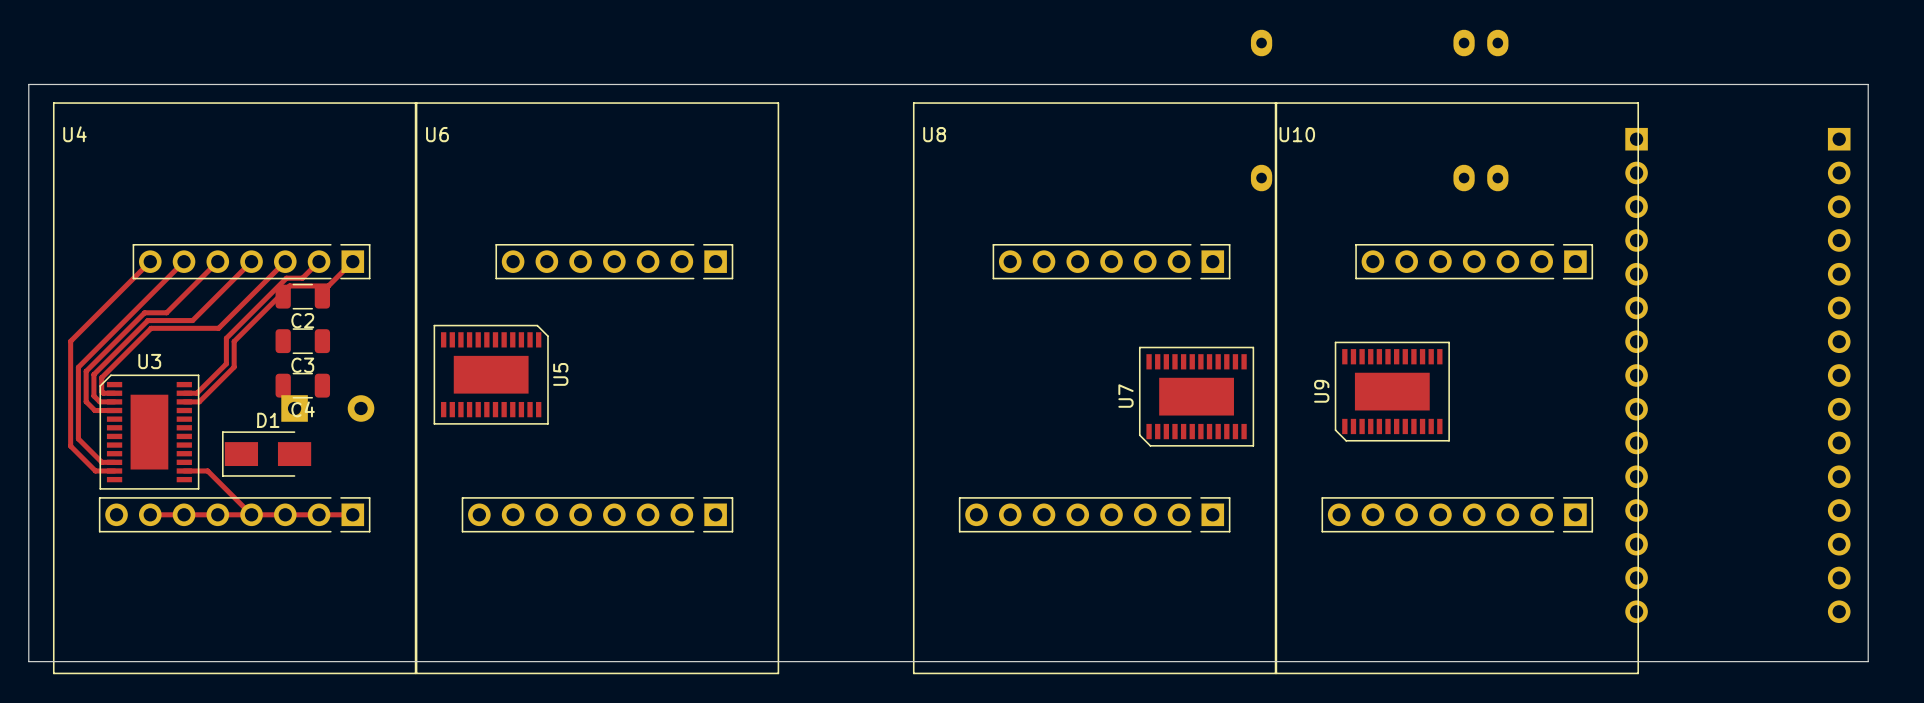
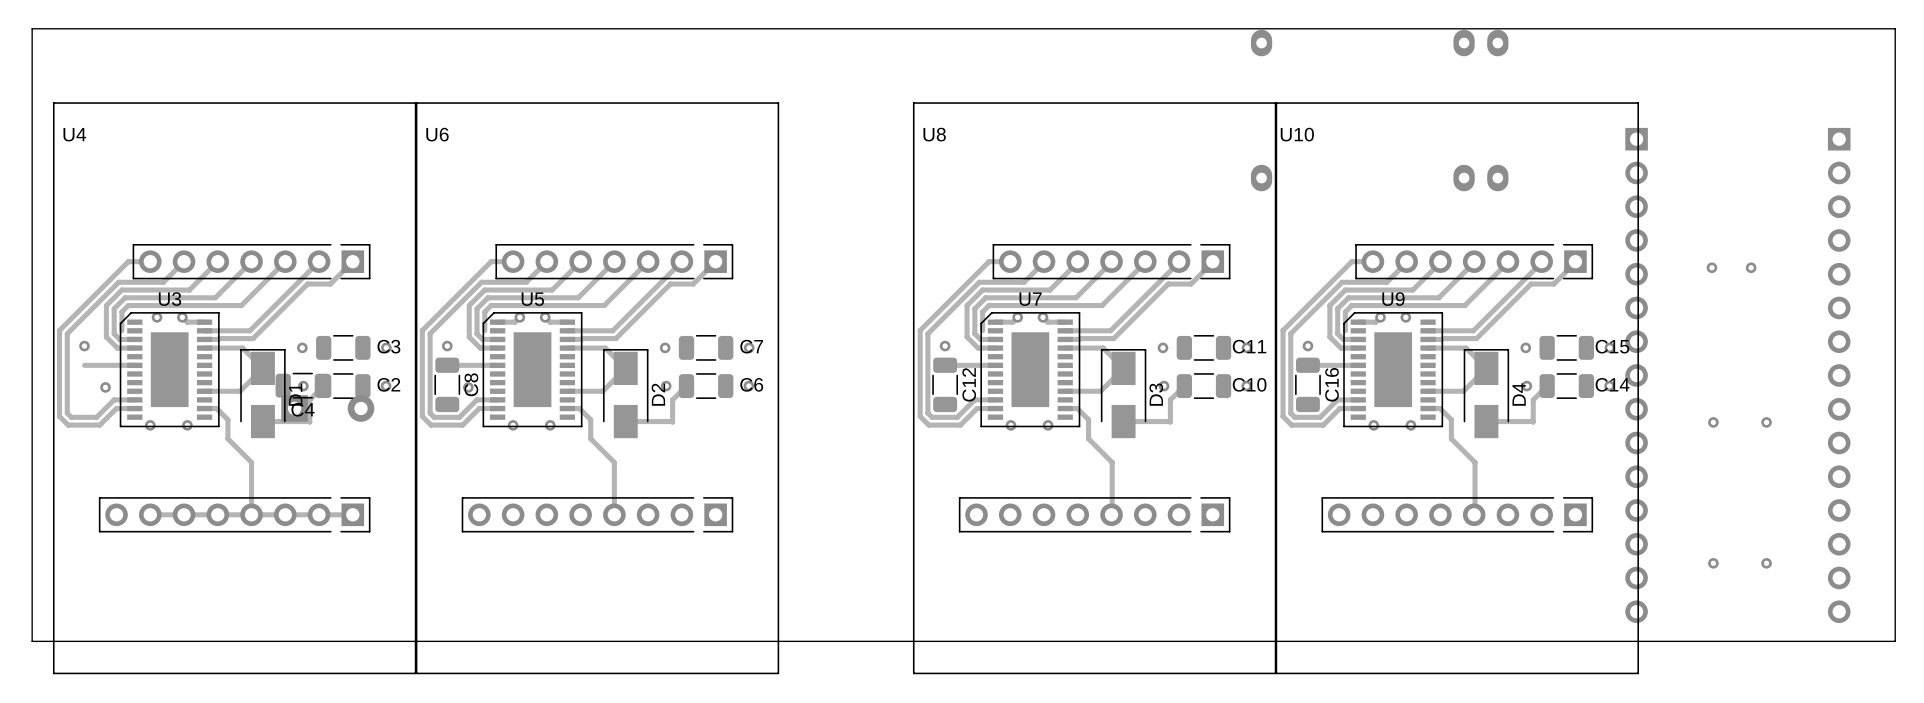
board edge: (28, 84) (28, 661) (1868, 661) (1868, 84) (28, 84) -> (32, 28) (32, 641) (1895, 641) (1895, 28) (32, 28)
track: (150, 261) (121, 290) -> (189, 290) (121, 290)
track: none -> (150, 261) (128, 261) (59, 330) (59, 416) (68, 425) (99, 425) (116, 408) (134, 408)
track: none -> (513, 261) (491, 261) (422, 330) (422, 416) (430, 425) (462, 425) (479, 408) (497, 408)
track: none -> (546, 261) (526, 282) (481, 282) (430, 333) (430, 413) (434, 417) (459, 417) (476, 399) (497, 399)
track: none -> (580, 261) (552, 290) (484, 290) (469, 305) (469, 337) (480, 348) (497, 348)
track: none -> (614, 261) (578, 297) (487, 297) (477, 308) (477, 333) (482, 339) (497, 339)
track: none -> (648, 261) (604, 305) (491, 305) (484, 311) (484, 330)
track: none -> (681, 261) (612, 330) (567, 330)
track: none -> (715, 261) (693, 284) (670, 284) (615, 338) (567, 339)
track: none -> (1010, 261) (989, 261) (920, 330) (920, 416) (928, 425) (960, 425) (977, 408) (995, 408)
track: none -> (1044, 261) (1024, 282) (979, 282) (927, 333) (927, 413) (932, 417) (957, 417) (974, 399) (995, 399)
track: none -> (1078, 261) (1050, 290) (982, 290) (967, 305) (967, 337) (978, 348) (995, 348)
track: none -> (1112, 261) (1076, 297) (985, 297) (974, 308) (974, 333) (980, 339) (995, 339)
track: none -> (1145, 261) (1102, 305) (989, 305) (982, 311) (982, 330)
track: none -> (1179, 261) (1110, 330) (1065, 330)
track: none -> (1213, 261) (1191, 284) (1168, 284) (1113, 338) (1065, 339)
track: none -> (1373, 261) (1351, 261) (1283, 330) (1283, 416) (1291, 425) (1323, 425) (1339, 408) (1358, 408)
track: none -> (1407, 261) (1386, 282) (1342, 282) (1290, 333) (1290, 413) (1294, 417) (1320, 417) (1337, 399) (1358, 399)
track: none -> (1441, 261) (1412, 290) (1345, 290) (1329, 305) (1329, 337) (1340, 348) (1358, 348)
track: none -> (1475, 261) (1438, 297) (1348, 297) (1337, 308) (1337, 333) (1343, 339) (1358, 339)
track: none -> (1508, 261) (1464, 305) (1351, 305) (1345, 311) (1345, 330)
track: none -> (1542, 261) (1473, 330) (1428, 330)
track: none -> (1576, 261) (1553, 284) (1531, 284) (1476, 338) (1428, 339)
via: none -> (1711, 267)
via: none -> (1751, 267)
track: (302, 278) (286, 278) (226, 338) (226, 363) (197, 393) (184, 393) -> (302, 278) (249, 330) (204, 330)
track: (163, 282) (78, 367) (78, 438) (101, 462) (114, 462) -> (163, 282) (118, 282) (67, 333) (67, 413) (71, 417) (96, 417) (114, 399) (134, 399)
track: (330, 284) (328, 285) (289, 285) (234, 341) (234, 367) (199, 401) (184, 401) -> (330, 284) (307, 284) (253, 338) (204, 339)
track: (189, 290) (166, 312) (144, 312) (86, 371) (86, 401) (94, 410) (114, 410) -> none
C2 position: (302, 296) -> (343, 386)
track: (215, 297) (192, 320) (147, 320) (93, 374) (93, 396) (99, 401) (114, 401) -> (215, 297) (125, 297) (114, 308) (114, 333) (119, 339) (134, 339)
track: (106, 305) (70, 341) (70, 446) (95, 470) (114, 470) -> (106, 305) (106, 337) (117, 348) (134, 348)
track: (241, 305) (218, 328) (151, 328) (101, 377) (101, 391) (103, 393) (114, 393) -> (241, 305) (128, 305) (121, 311) (121, 330)
via: none -> (157, 317)
track: none -> (182, 317) (187, 322) (204, 322)
via: none -> (182, 317)
track: none -> (519, 317) (515, 322) (497, 322)
via: none -> (519, 317)
track: none -> (545, 317) (549, 322) (567, 322)
via: none -> (545, 317)
track: none -> (1017, 317) (1012, 322) (995, 322)
via: none -> (1017, 317)
track: none -> (1043, 317) (1047, 322) (1065, 322)
via: none -> (1043, 317)
track: none -> (1380, 317) (1375, 322) (1358, 322)
via: none -> (1380, 317)
via: none -> (1405, 317)
C2 name position: C2 (302, 320) -> C2 (388, 384)
C3 position: (302, 341) -> (343, 347)
via: none -> (84, 346)
via: none -> (447, 346)
via: none -> (945, 346)
via: none -> (1307, 346)
via: none -> (302, 347)
via: none -> (386, 347)
via: none -> (665, 347)
C7: none -> (706, 347)
via: none -> (749, 347)
via: none -> (1162, 347)
C11: none -> (1203, 347)
via: none -> (1247, 347)
via: none -> (1525, 347)
C15: none -> (1566, 347)
via: none -> (1609, 347)
track: none -> (204, 348) (242, 348) (262, 368) (240, 391) (204, 391)
track: none -> (567, 348) (605, 348) (625, 368) (602, 391) (567, 391)
track: none -> (1065, 348) (1103, 348) (1123, 368) (1100, 391) (1065, 391)
track: none -> (1428, 348) (1466, 348) (1486, 368) (1463, 391) (1428, 391)
track: none -> (84, 365) (134, 365)
C3 name position: C3 (302, 365) -> C3 (388, 346)
track: none -> (447, 365) (497, 365)
track: none -> (945, 365) (995, 365)
track: none -> (1308, 365) (1358, 365)
U5 rotation: 0° (491, 374) -> 90° counterclockwise (532, 369)
C8: none -> (447, 384)
C12: none -> (945, 384)
C16: none -> (1307, 384)
via: none -> (303, 386)
track: none -> (323, 386) (309, 399) (309, 421) (262, 421)
via: none -> (386, 386)
via: none -> (666, 386)
track: none -> (686, 386) (672, 399) (672, 421) (625, 421)
C6: none -> (706, 386)
via: none -> (748, 386)
via: none -> (1164, 386)
track: none -> (1184, 386) (1170, 399) (1170, 421) (1123, 421)
C10: none -> (1203, 386)
via: none -> (1246, 386)
via: none -> (1526, 386)
track: none -> (1547, 386) (1533, 399) (1533, 421) (1486, 421)
C14: none -> (1566, 386)
via: none -> (1609, 386)
via: none -> (105, 387)
via: none -> (468, 387)
U9 rotation: 0° (1392, 391) -> 90° clockwise (1393, 369)
D2: none -> (625, 393)
D3: none -> (1123, 393)
D4: none -> (1486, 393)
U7 rotation: 0° (1196, 396) -> 90° clockwise (1030, 369)
U7 position: (1196, 396) -> (1030, 369)
track: none -> (567, 408) (579, 408) (590, 419) (590, 438) (614, 462) (614, 514)
track: none -> (1065, 408) (1077, 408) (1088, 419) (1088, 438) (1112, 462) (1112, 514)
track: none -> (1428, 408) (1440, 408) (1451, 419) (1451, 438) (1475, 462) (1475, 514)
via: none -> (1713, 422)
via: none -> (1766, 422)
via: none -> (150, 425)
via: none -> (187, 425)
via: none -> (513, 425)
via: none -> (550, 425)
via: none -> (1010, 425)
via: none -> (1048, 425)
via: none -> (1373, 425)
via: none -> (1410, 425)
U3 position: (149, 432) -> (169, 369)
D1 rotation: 0° (266, 454) -> 90° clockwise (262, 393)
D1 position: (266, 454) -> (262, 393)
track: (184, 470) (207, 470) (251, 514) -> (204, 408) (216, 408) (227, 419) (227, 438) (251, 462) (251, 514)
via: none -> (1713, 563)
via: none -> (1766, 563)

